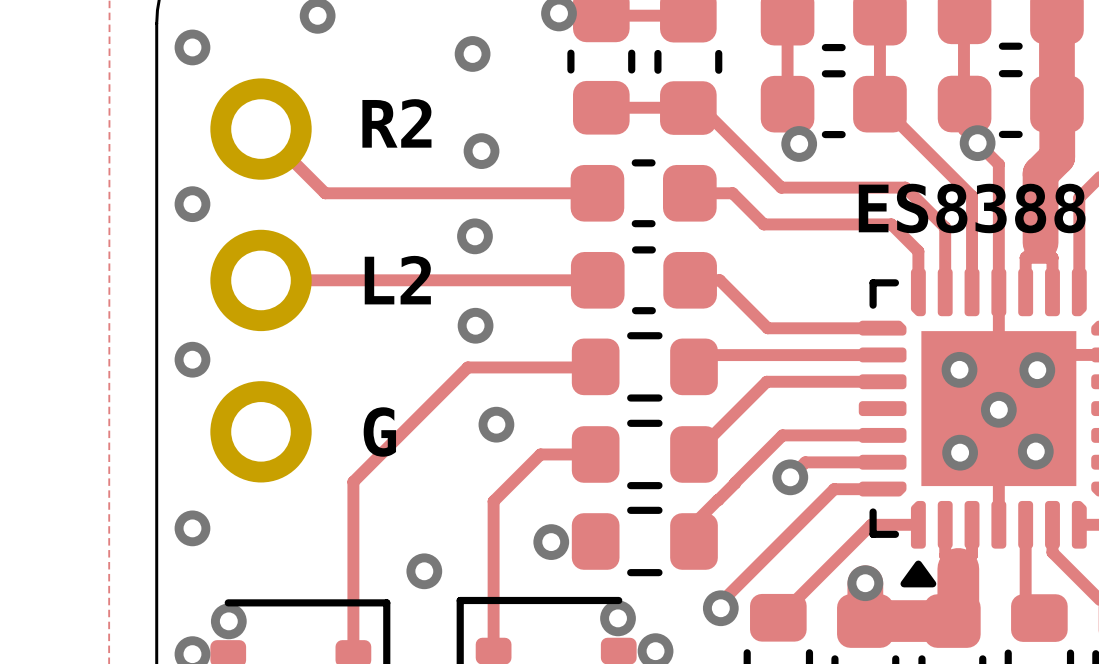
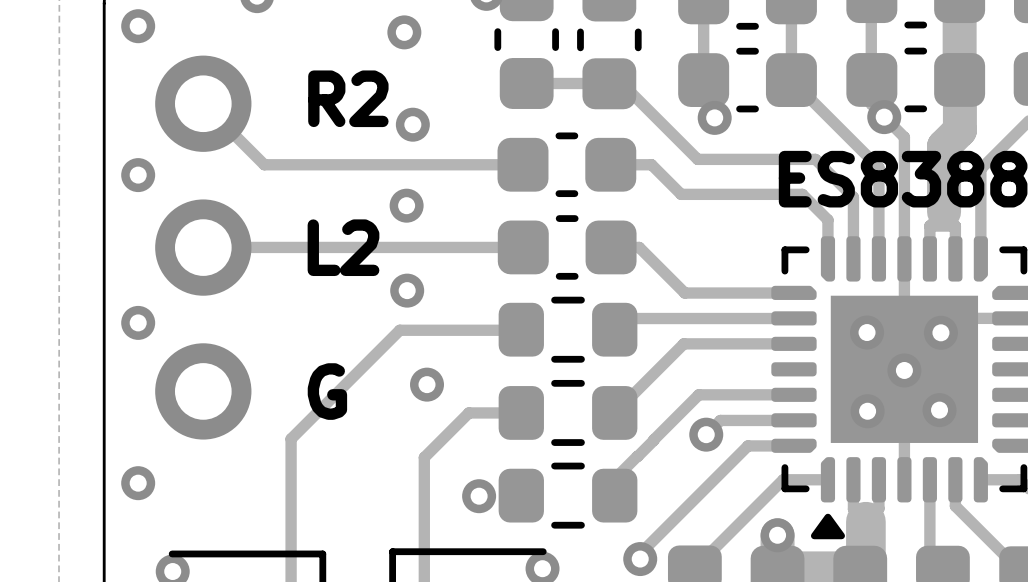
via: (424, 571) -> none

